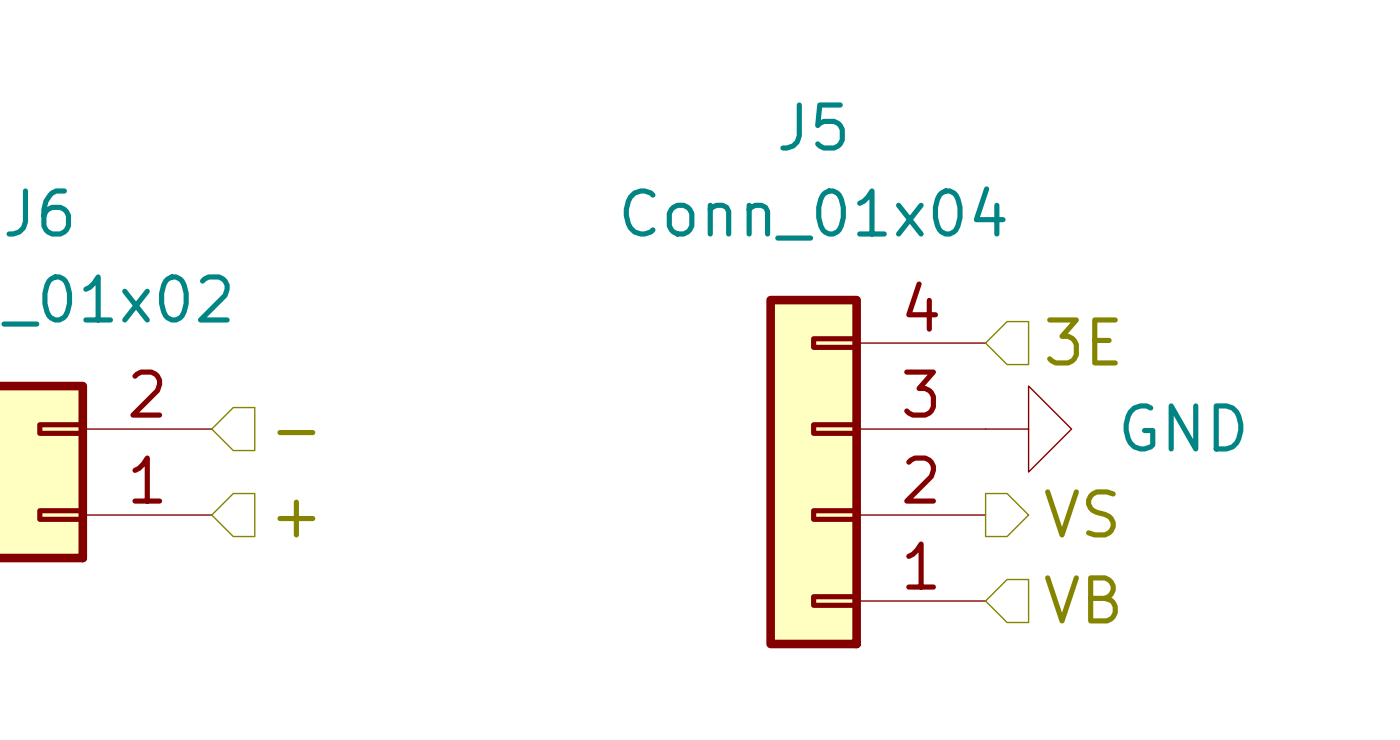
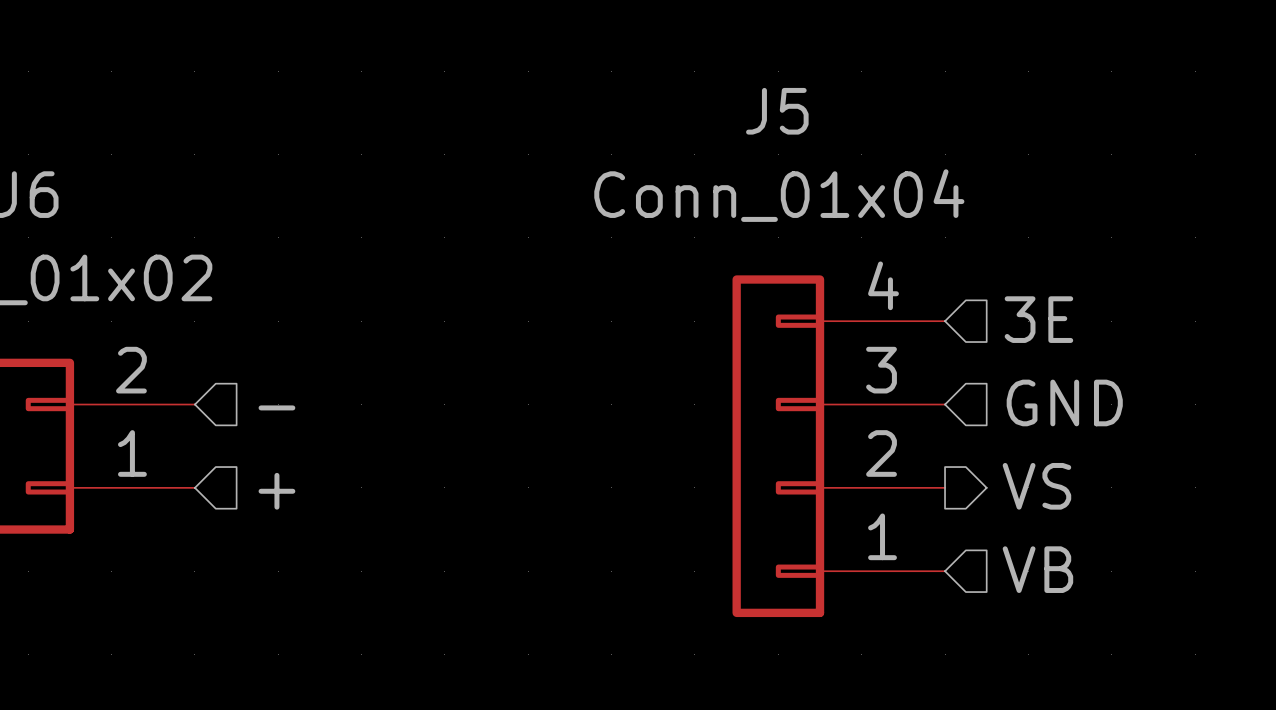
hierarchical label: none -> GND (1064, 402)
power symbol: GND (1028, 429) -> none

